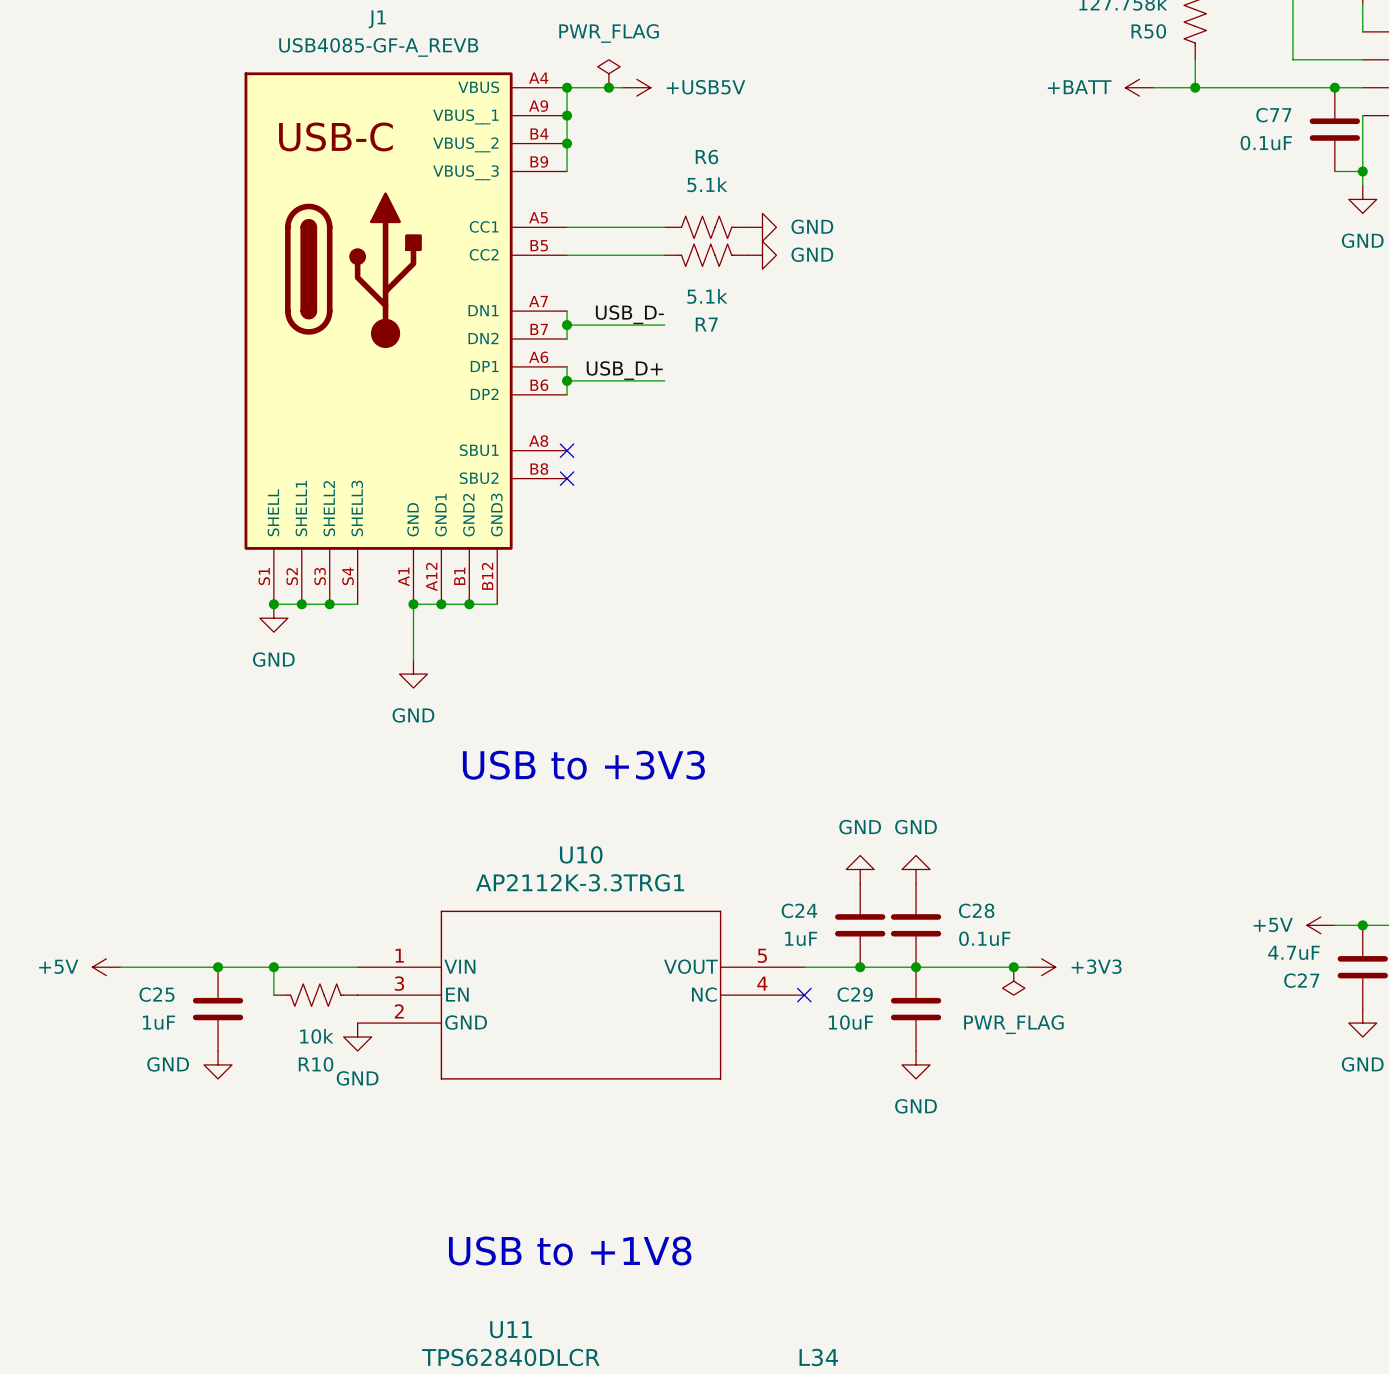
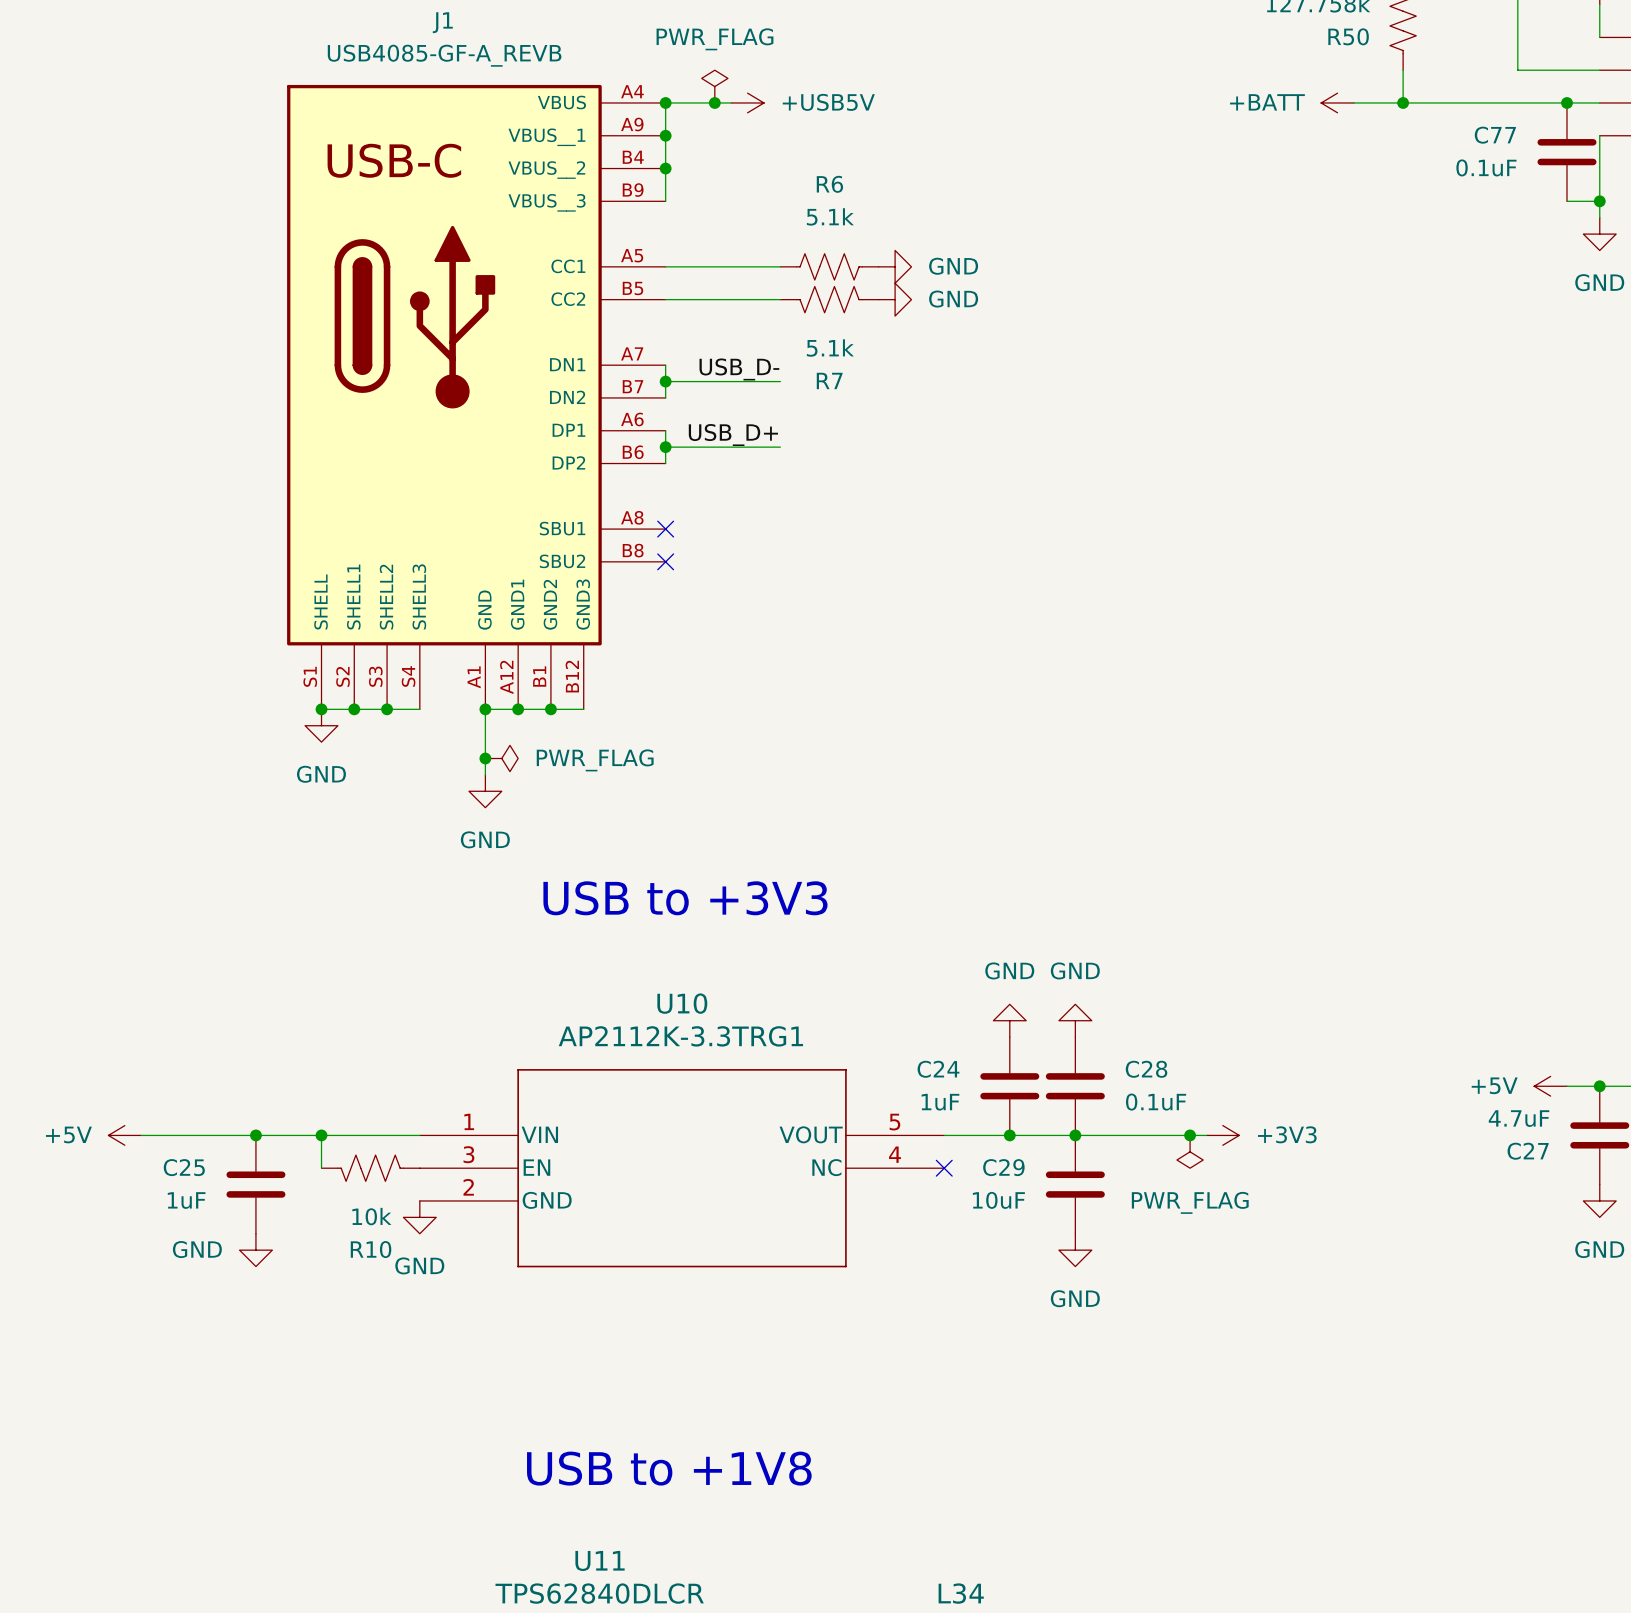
junction: none -> (485, 758)
power symbol: none -> PWR_FLAG (501, 758)

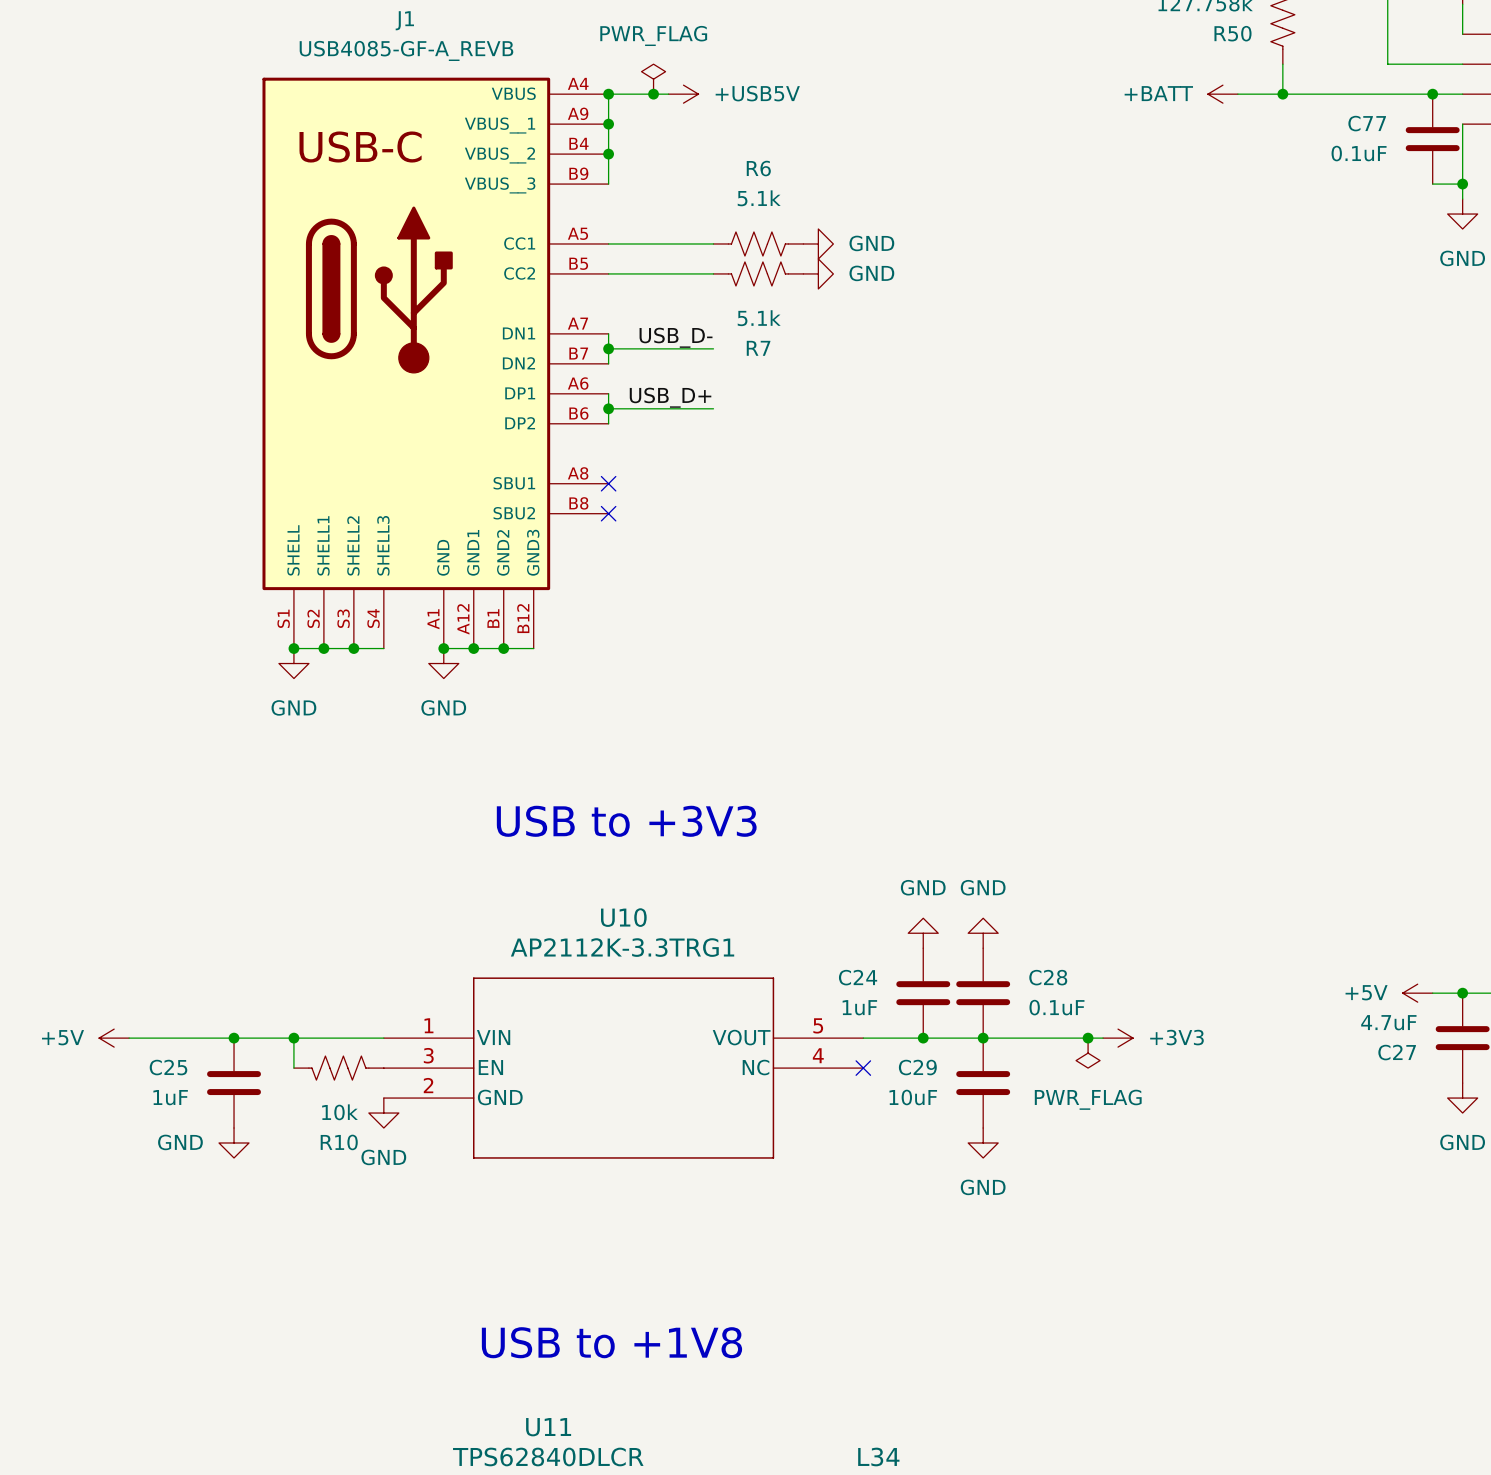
wire: (485, 709) (485, 774) -> none
junction: (485, 758) -> none
power symbol: PWR_FLAG (501, 758) -> none
power symbol position: GND (485, 791) -> GND (443, 663)

